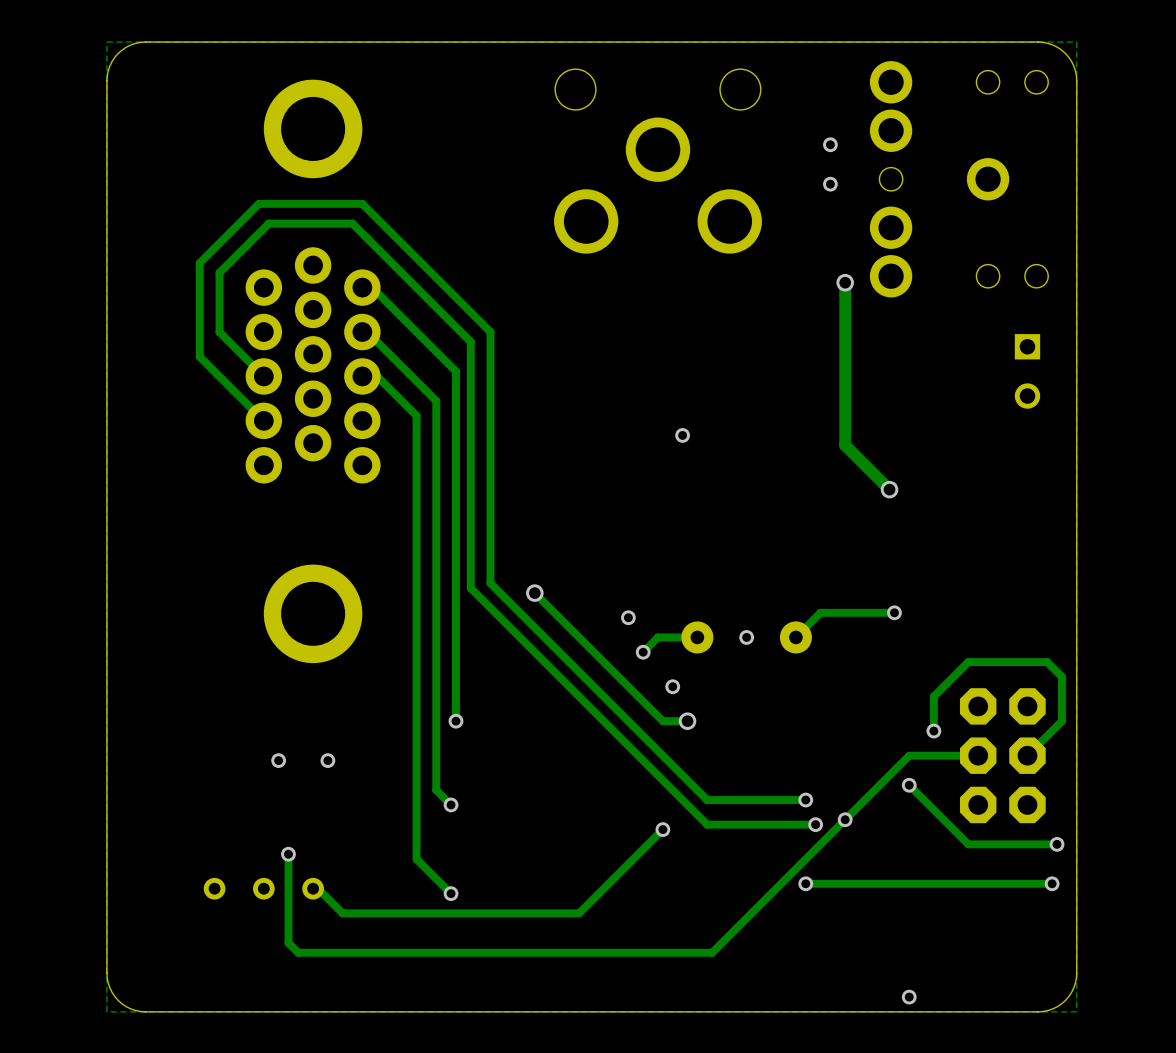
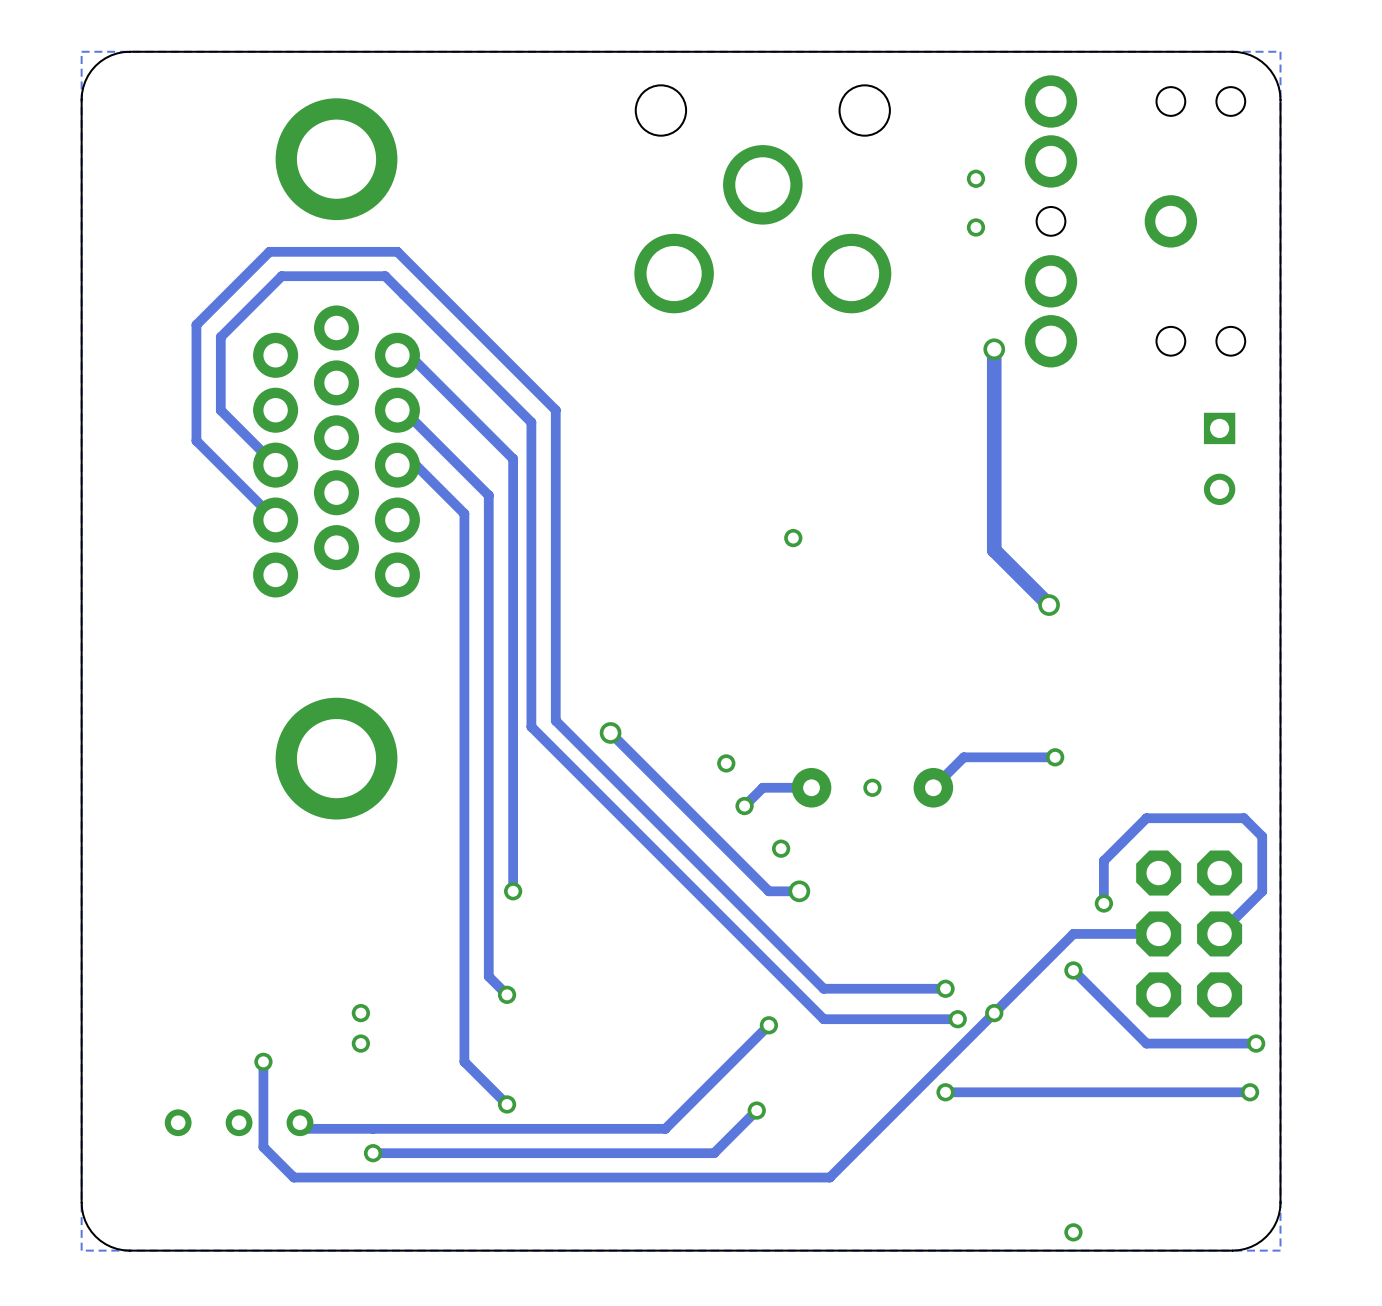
via: (278, 760) -> none
via: (327, 760) -> none
via: none -> (360, 1013)
via: none -> (360, 1043)
track: (288, 854) (288, 942) (298, 952) -> (263, 1061) (263, 1147) (293, 1177) (318, 1177)
via: (288, 854) -> none
via: none -> (263, 1061)
part position: (263, 888) -> (239, 1122)
track: (313, 888) (318, 888) (342, 913) -> (299, 1122) (306, 1128) (373, 1128)
track: none -> (756, 1110) (714, 1153) (373, 1153)
via: none -> (756, 1110)
via: none -> (373, 1153)

